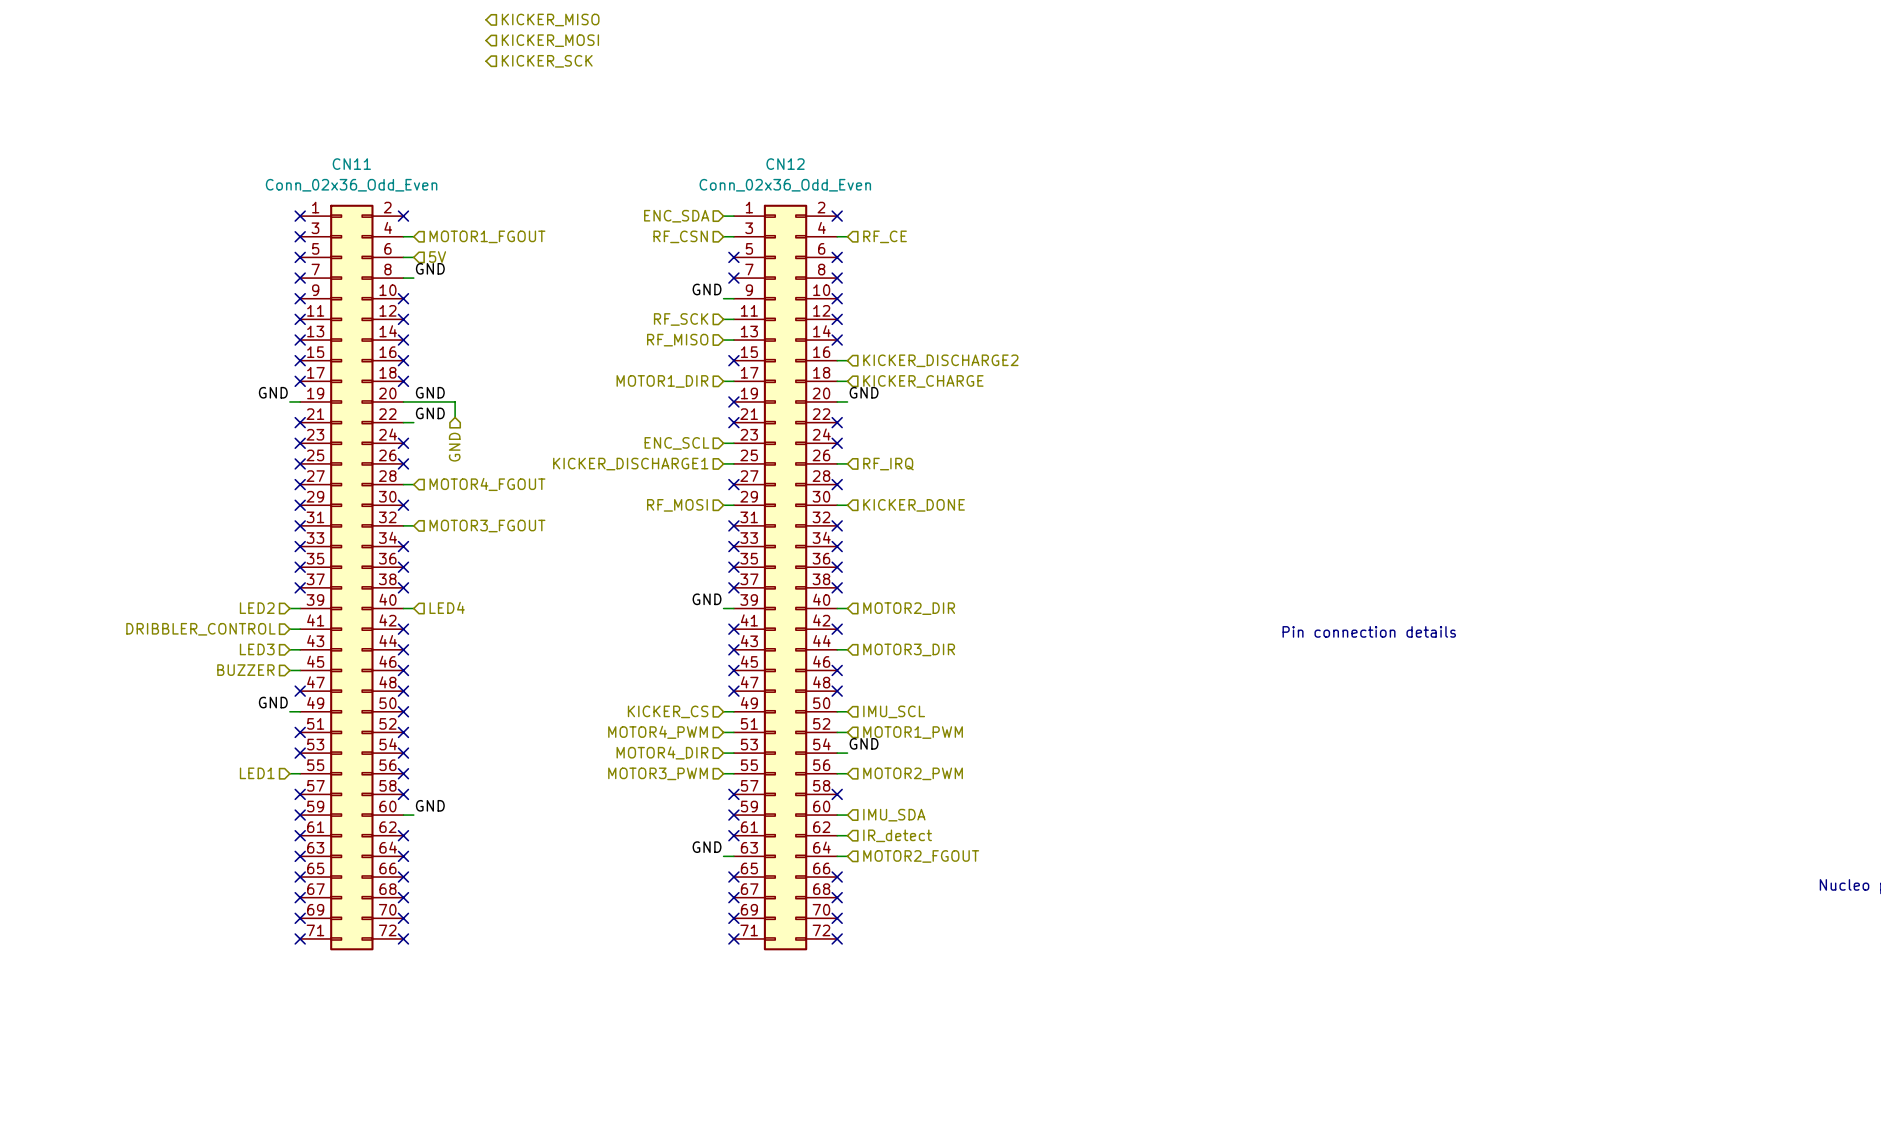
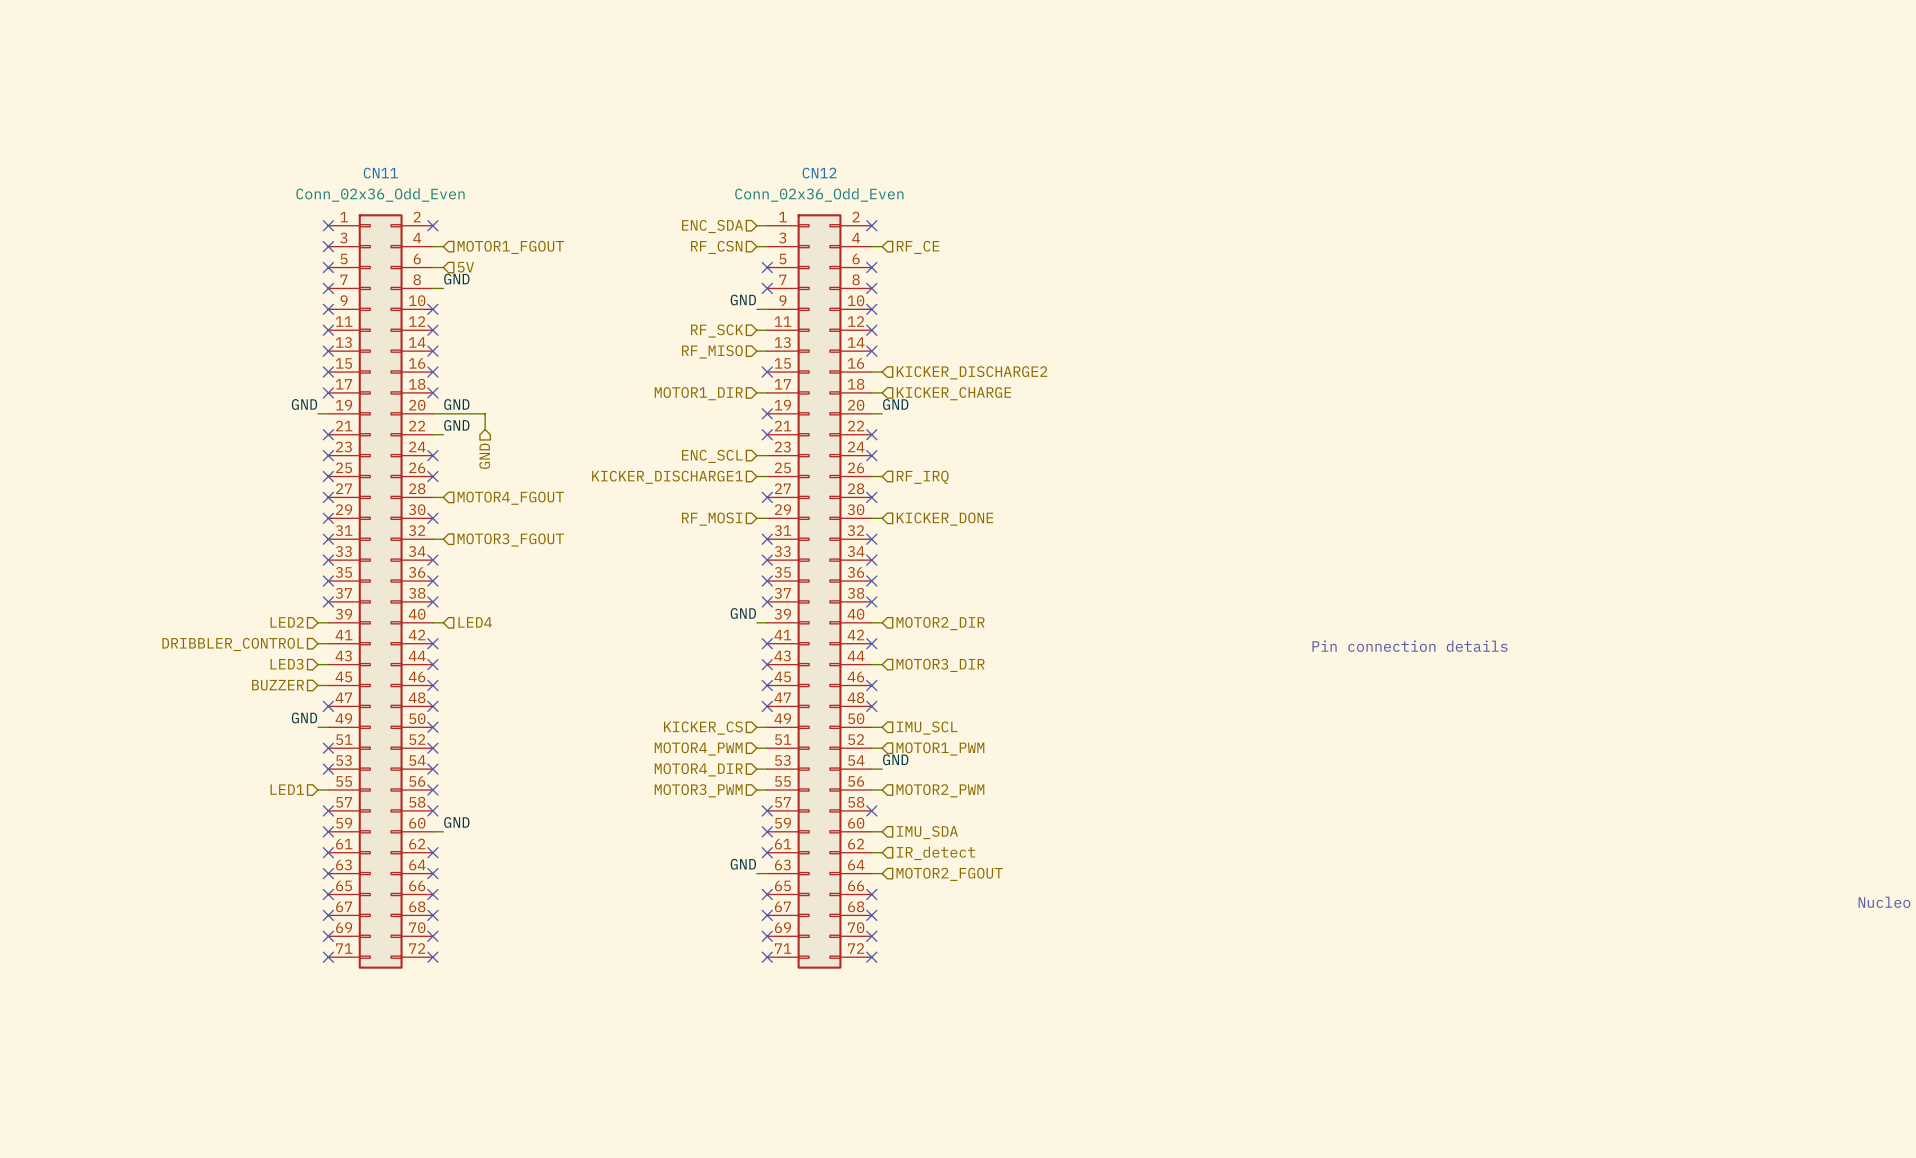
hierarchical label: KICKER_MISO (550, 20) -> none
hierarchical label: KICKER_MOSI (550, 40) -> none
hierarchical label: KICKER_SCK (547, 61) -> none

